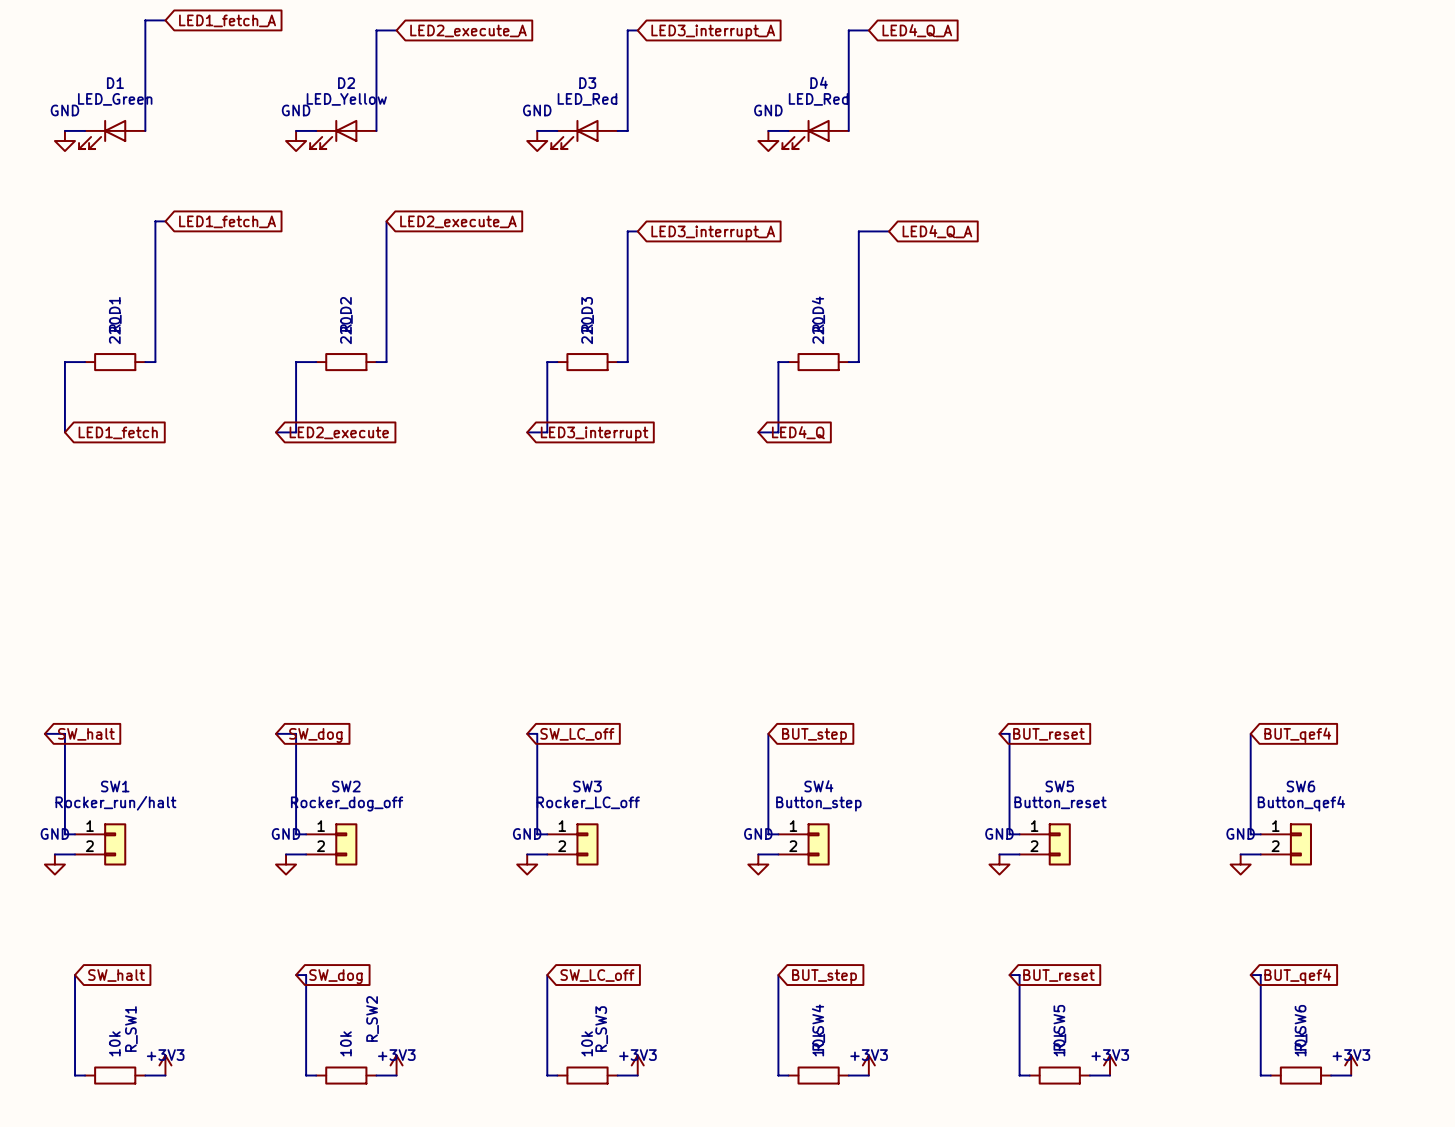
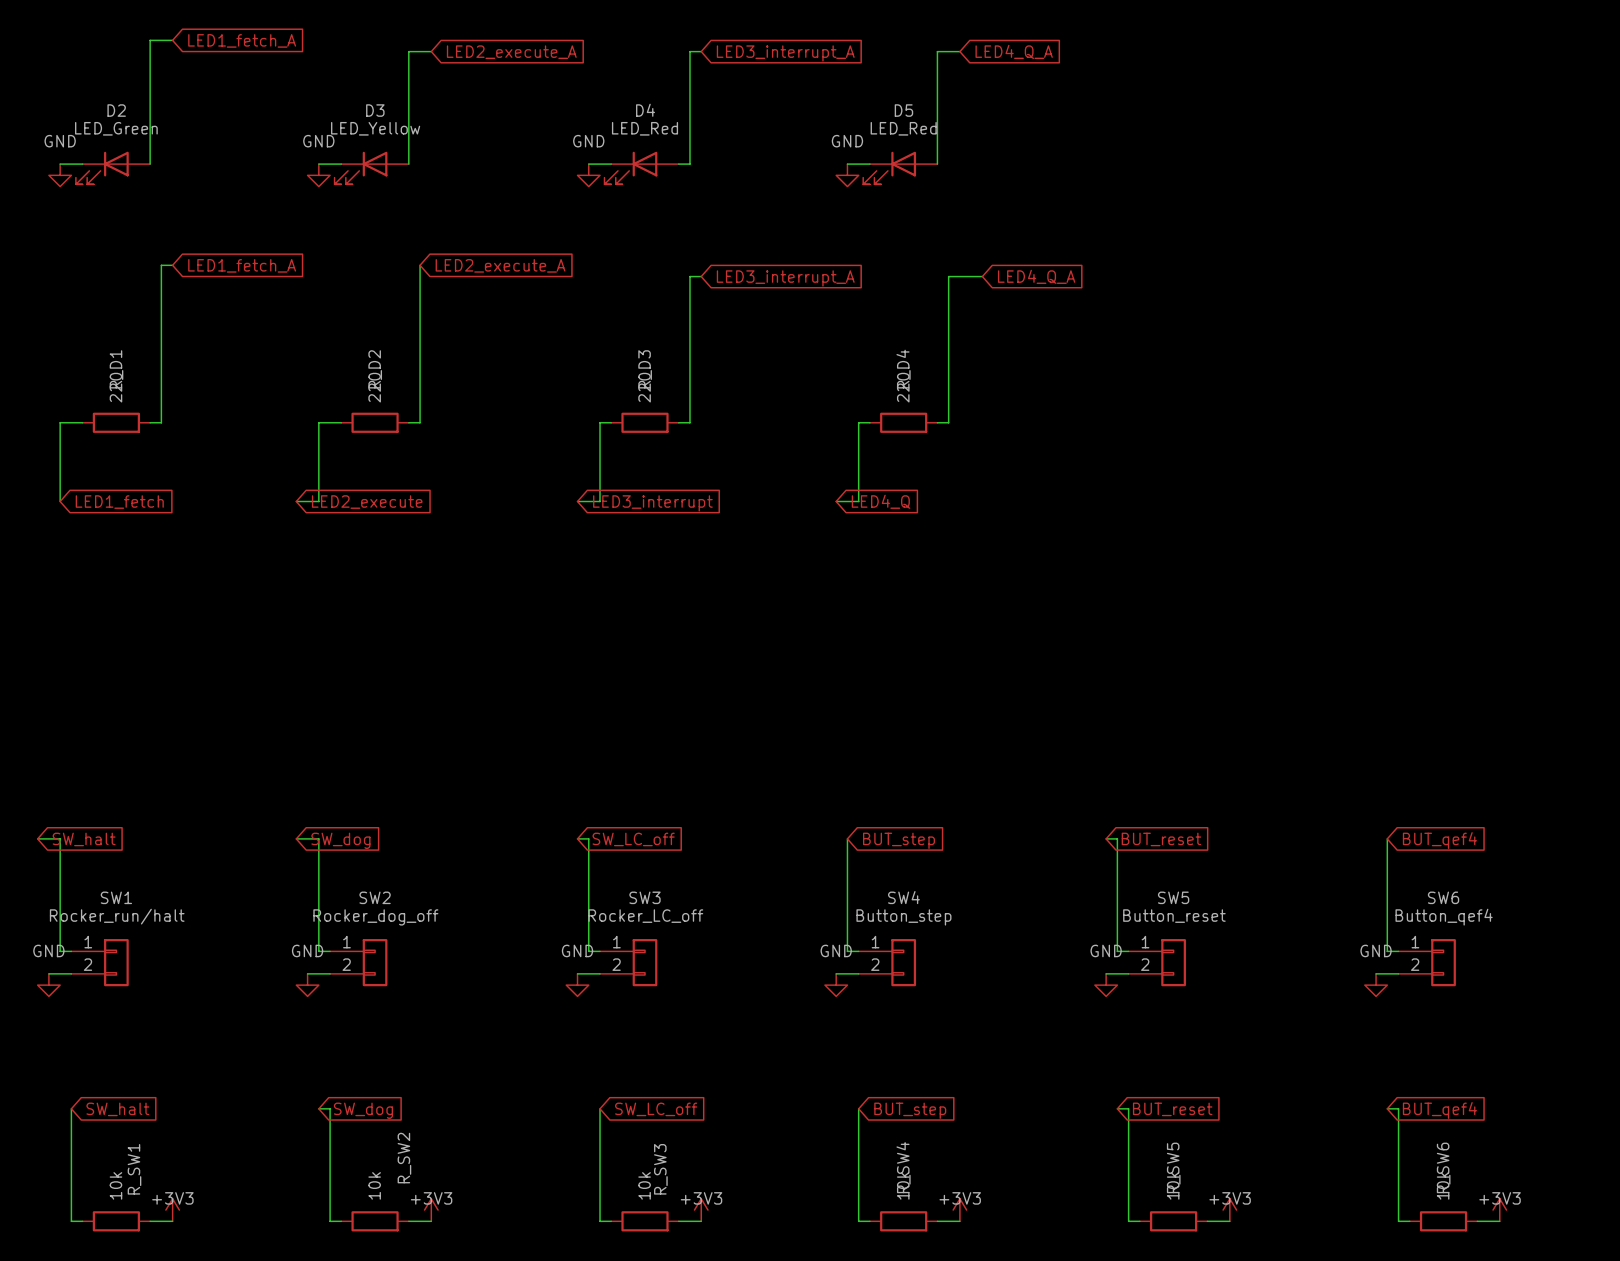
D4 name: D4 (819, 82) -> D5 (903, 110)
D1 name: D1 (115, 83) -> D2 (116, 110)
D2 name: D2 (346, 83) -> D3 (375, 110)
D3 name: D3 (587, 83) -> D4 (645, 110)

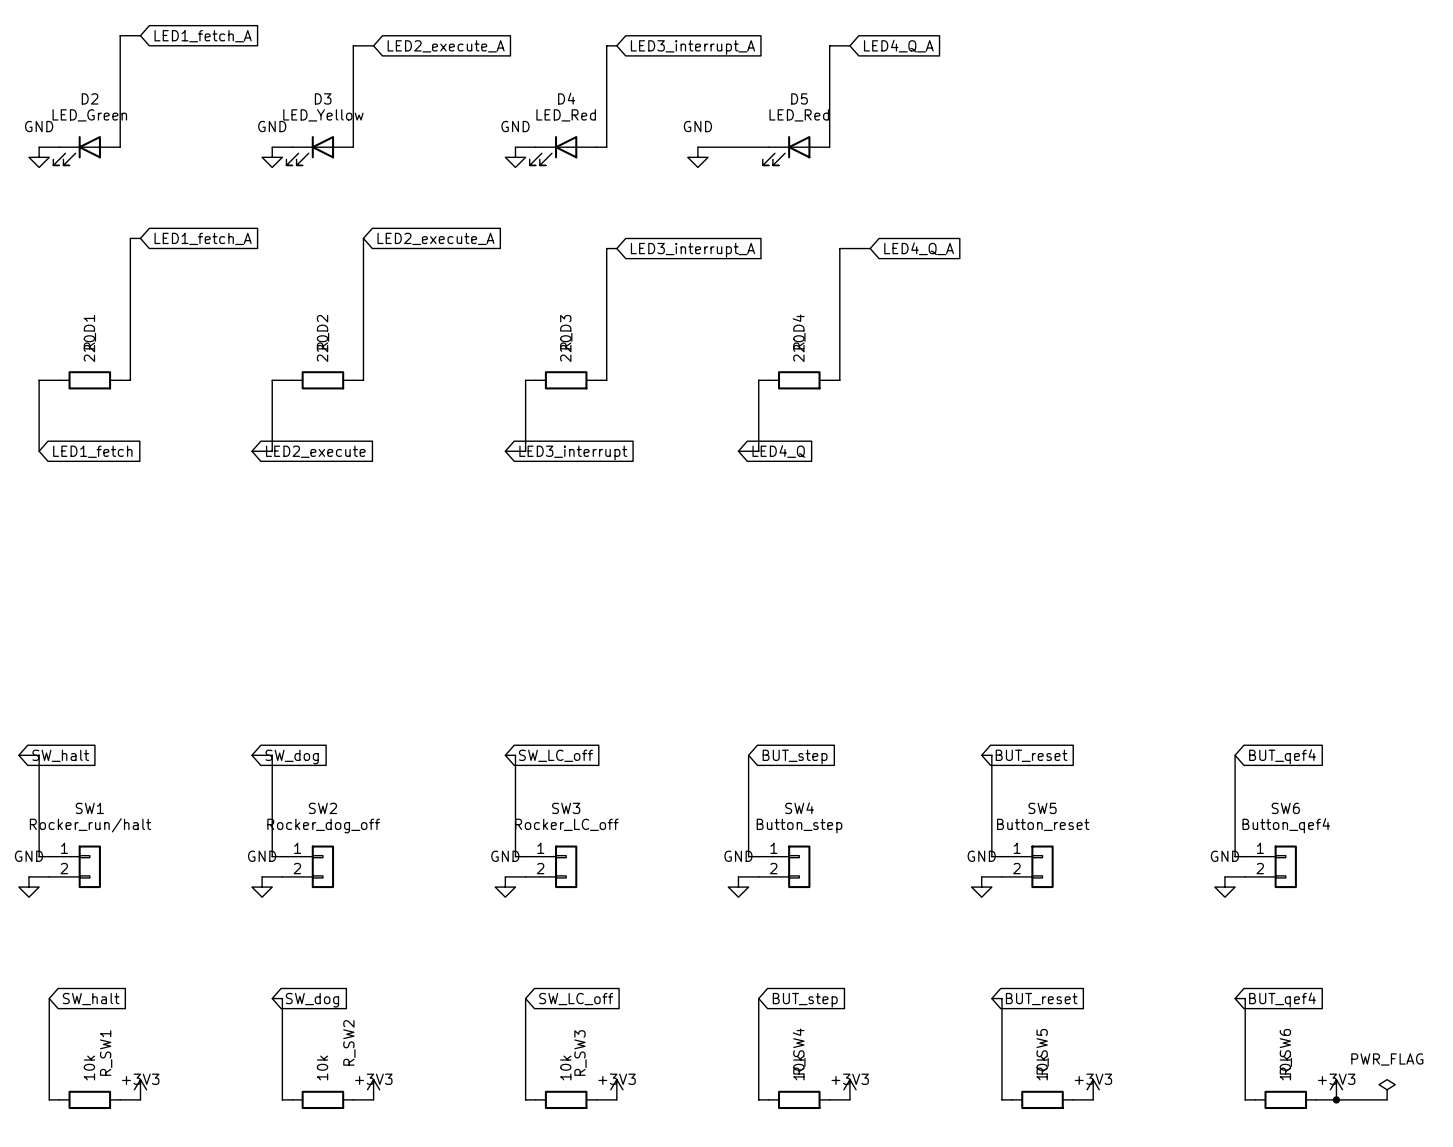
wire: none -> (697, 147) (748, 147)
power symbol position: GND (847, 175) -> GND (697, 157)
power symbol: none -> PWR_FLAG (1387, 1089)
wire: none -> (1336, 1099) (1387, 1099)
junction: none -> (1336, 1099)

